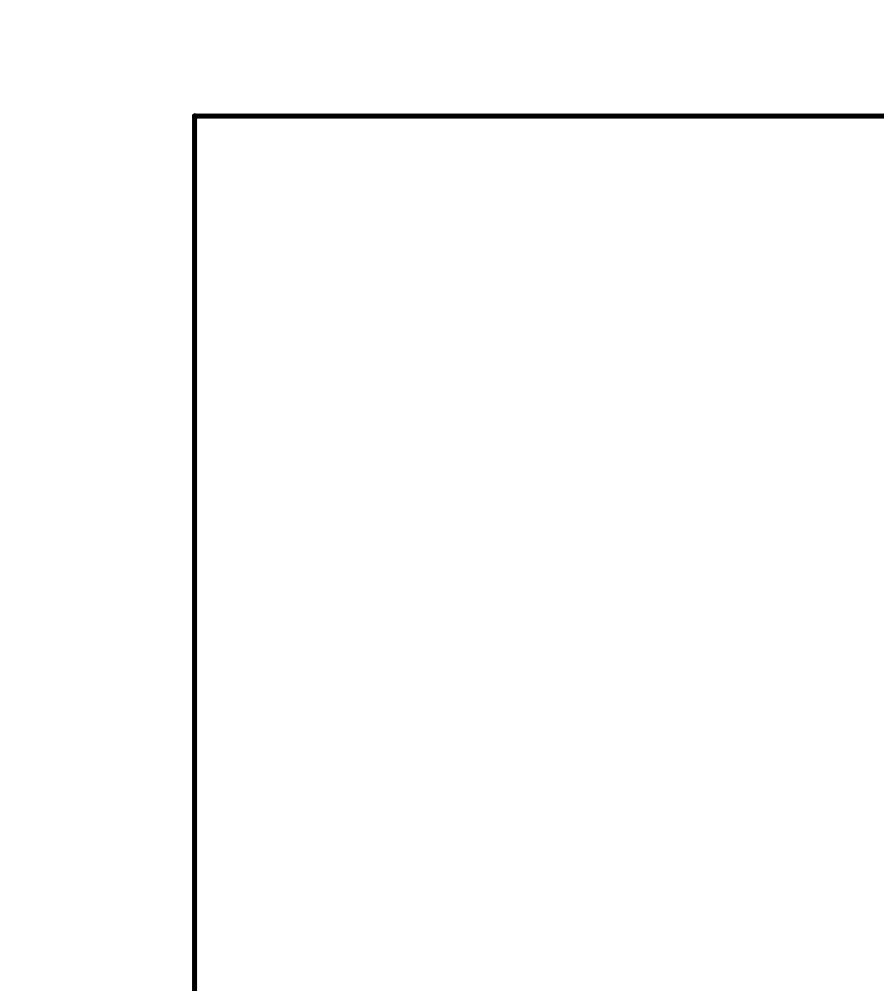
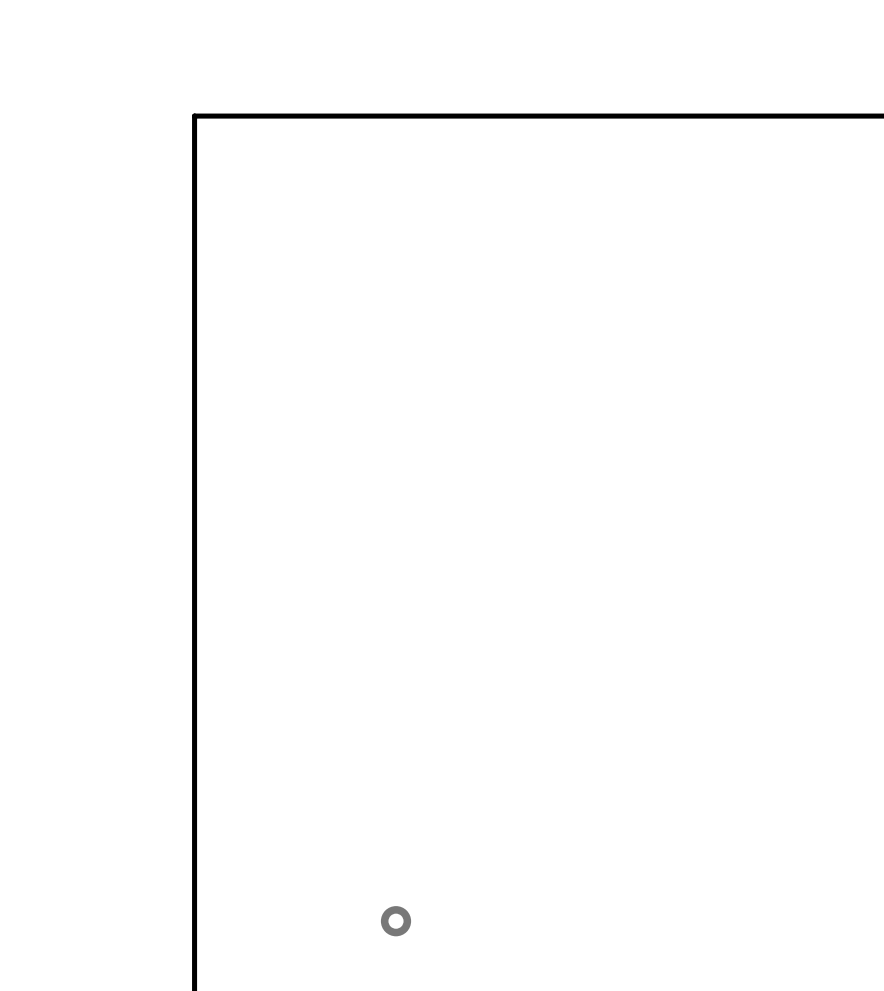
via: none -> (396, 921)

